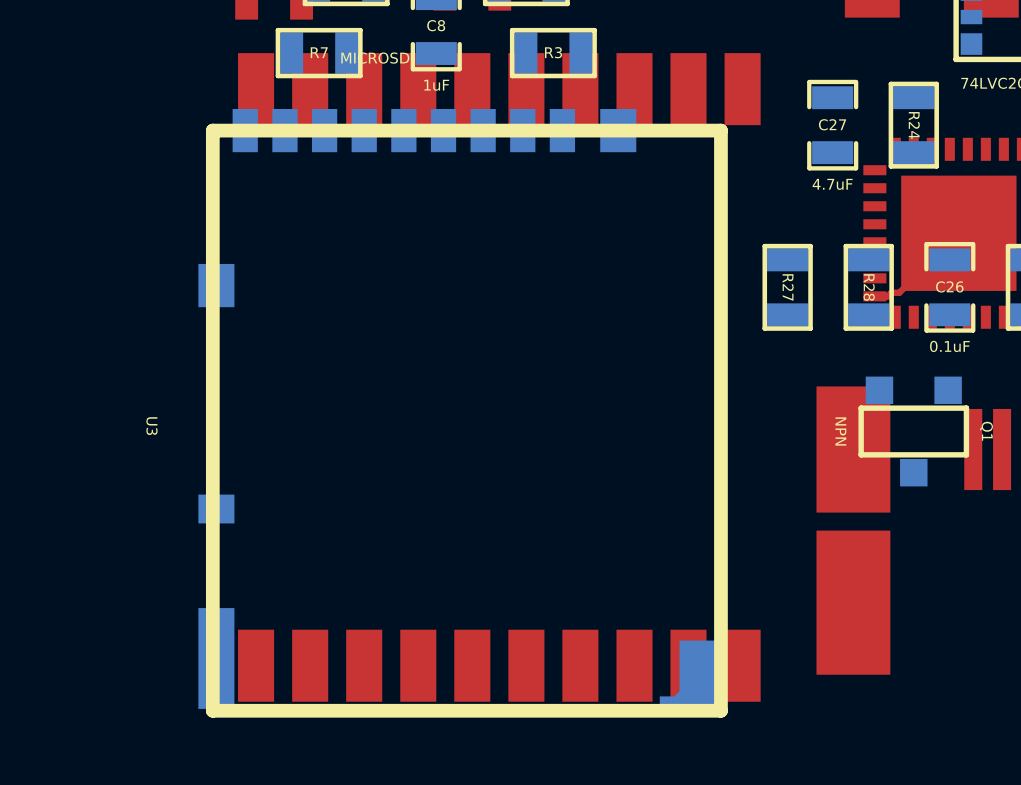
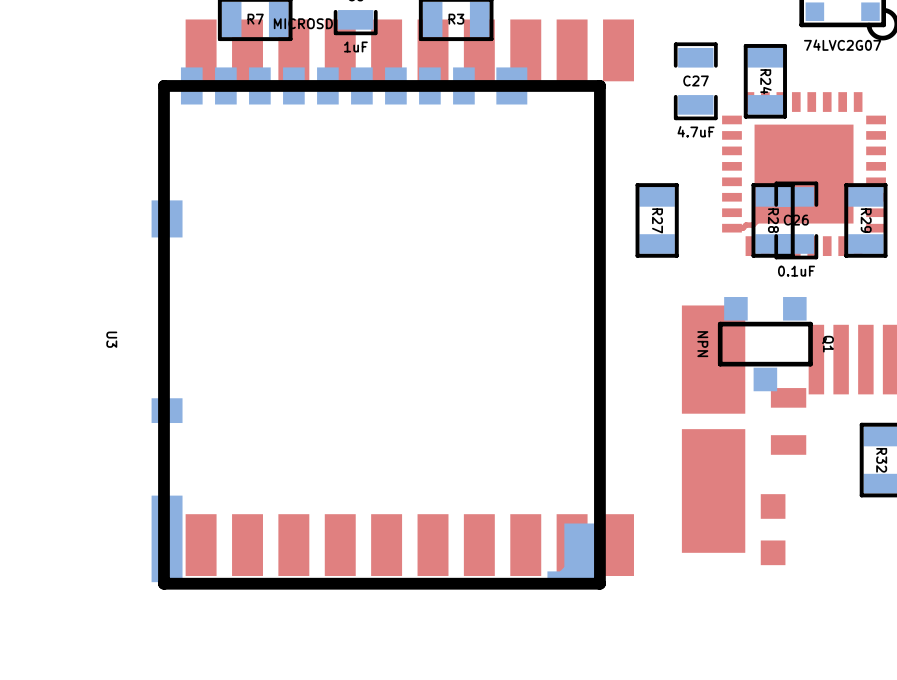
R28 position: (868, 287) -> (773, 220)
part: none -> (788, 421)
part: none -> (773, 529)

